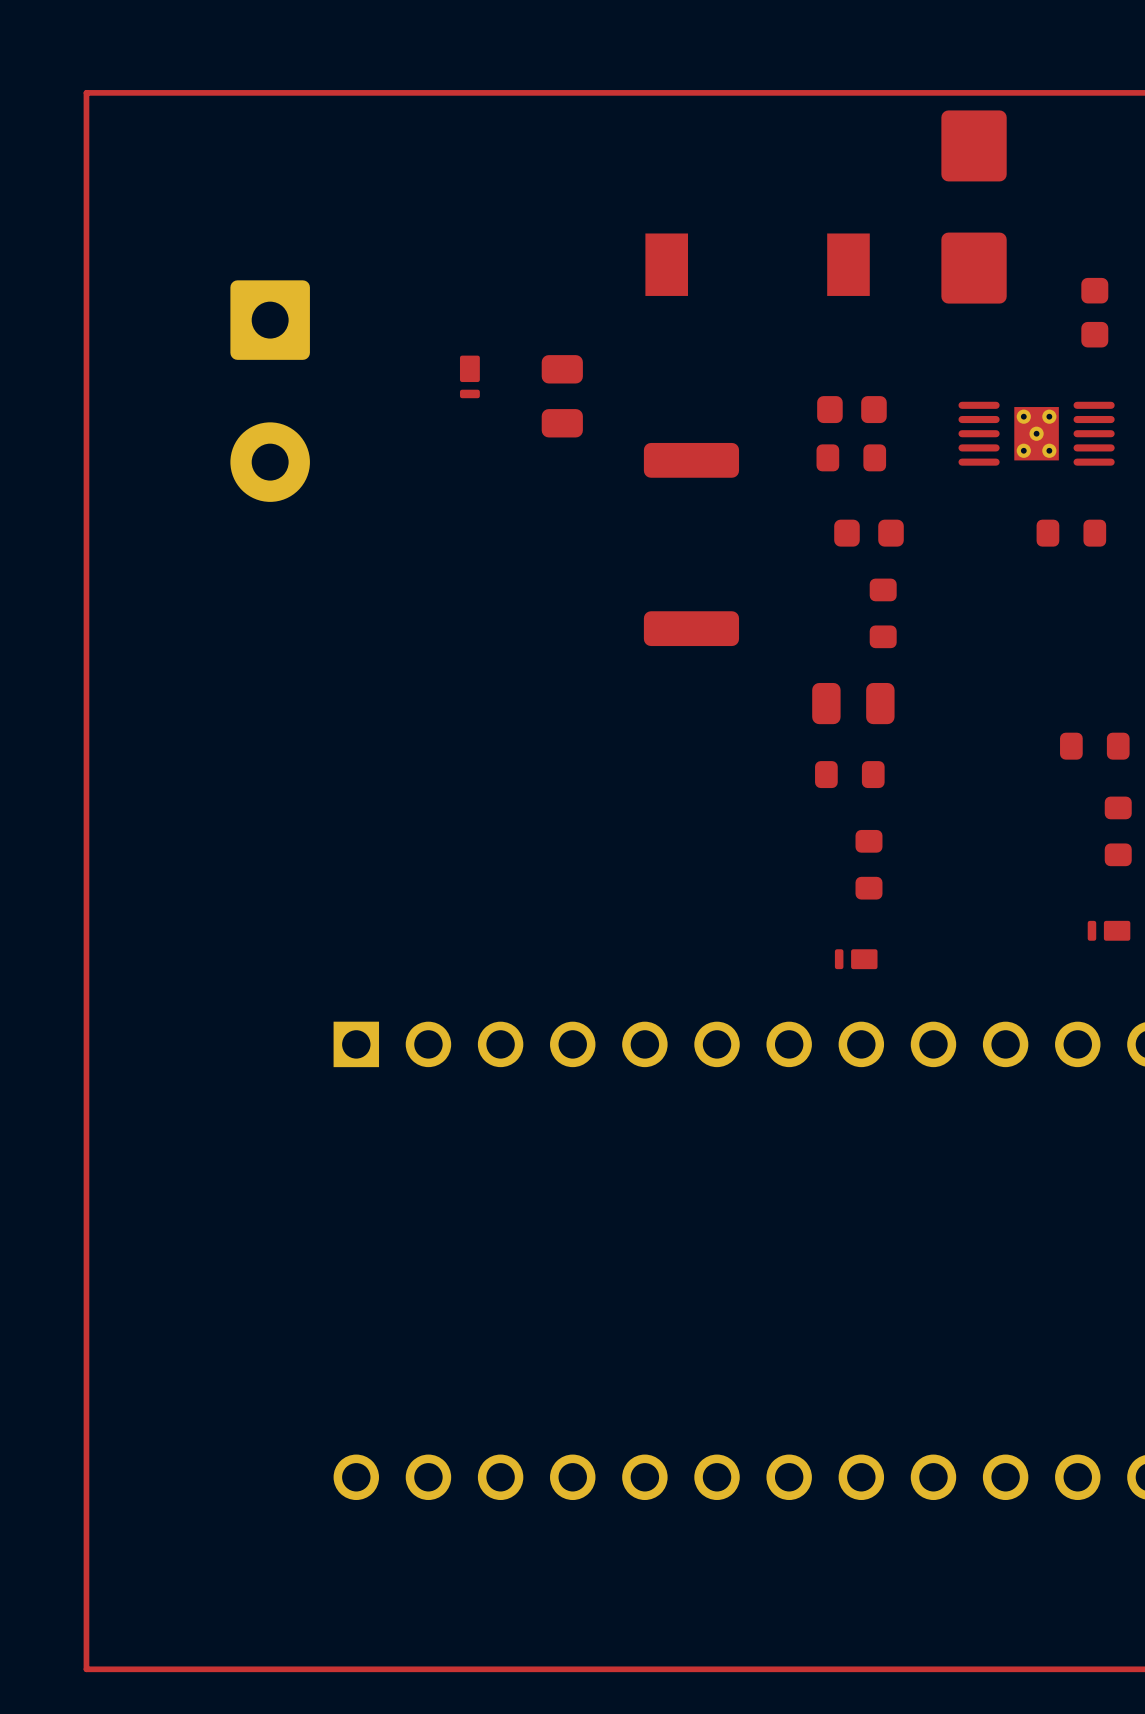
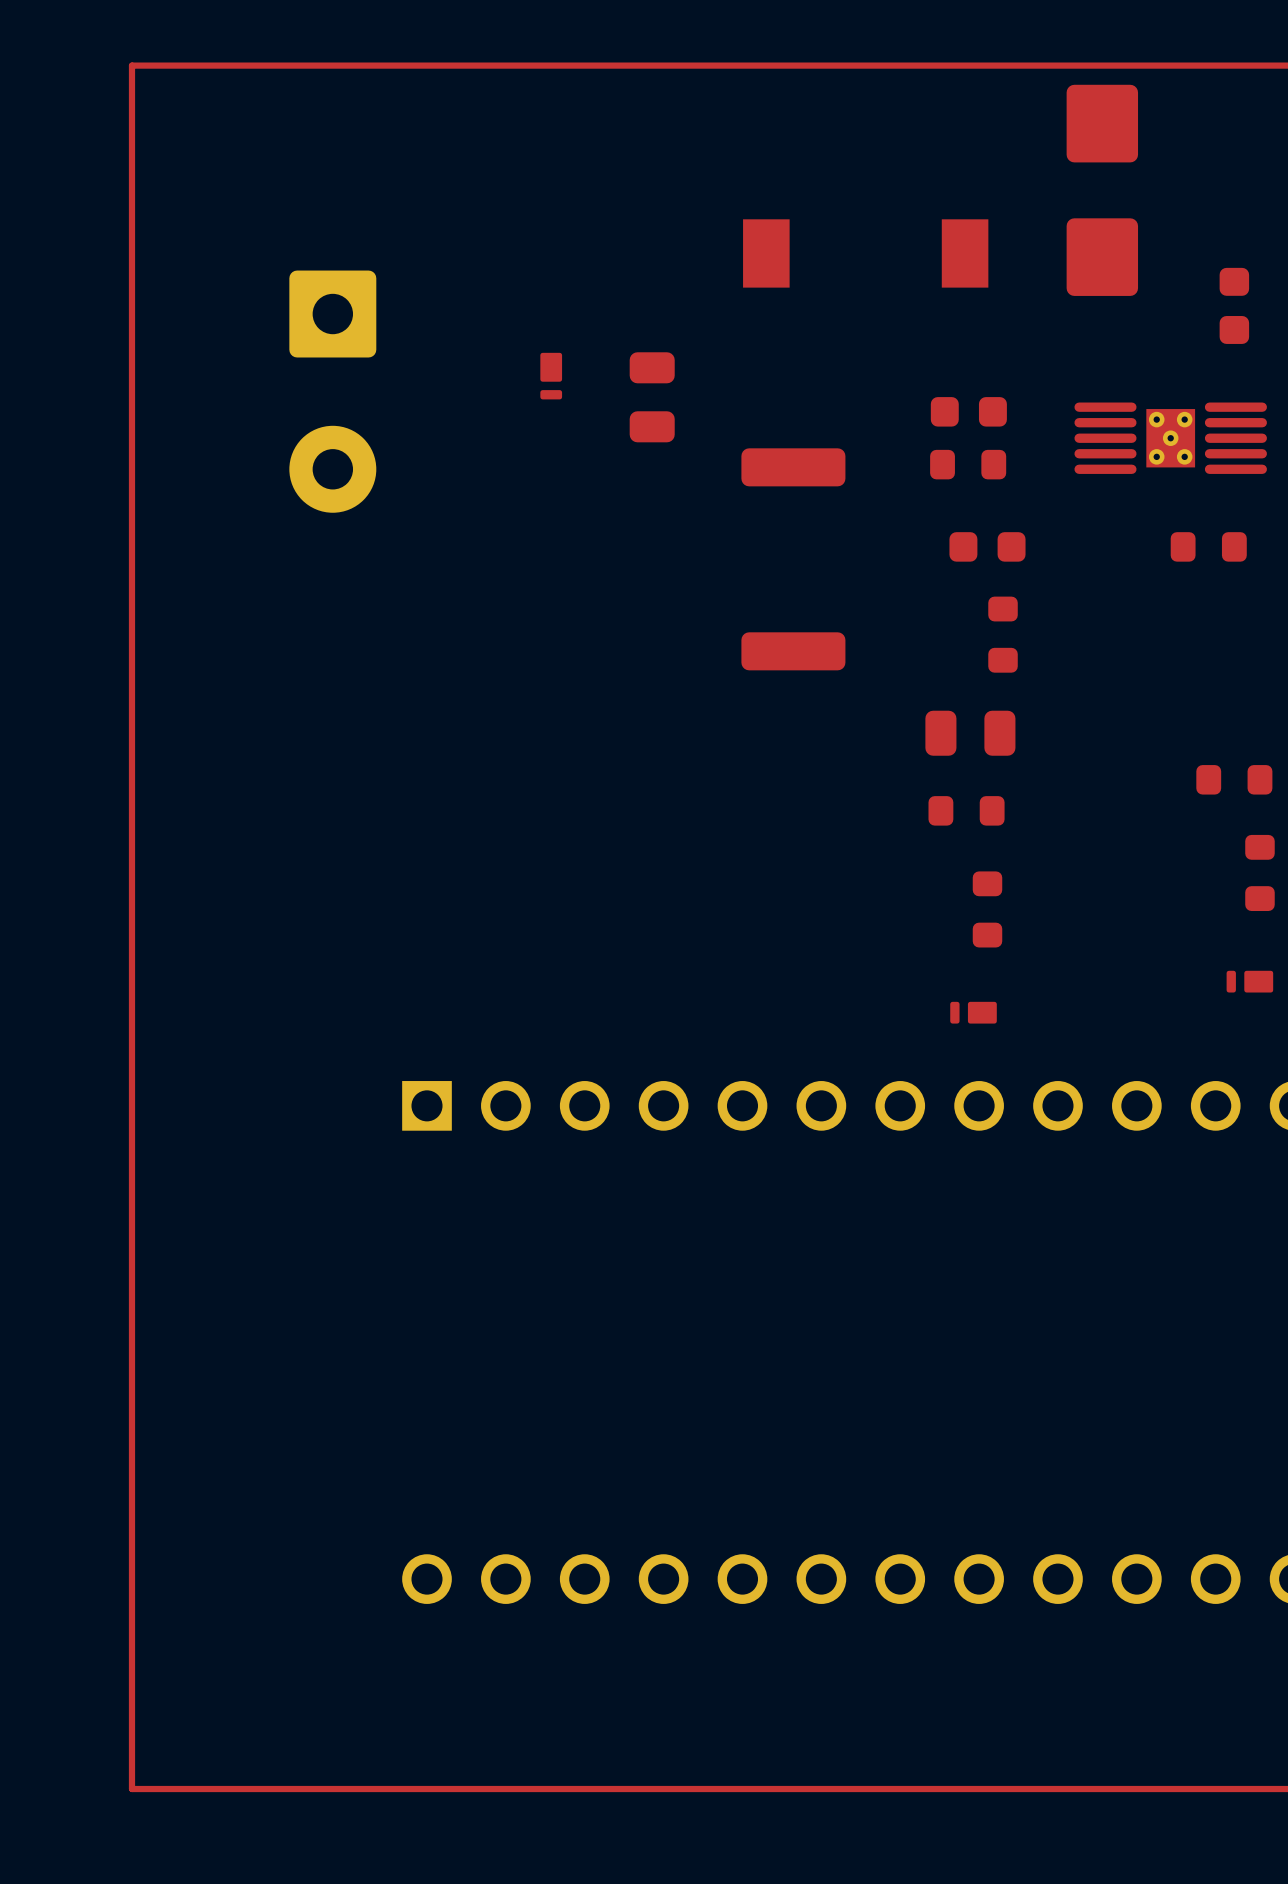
part footprint: [958, 401, 1115, 466] -> [1074, 402, 1267, 474]

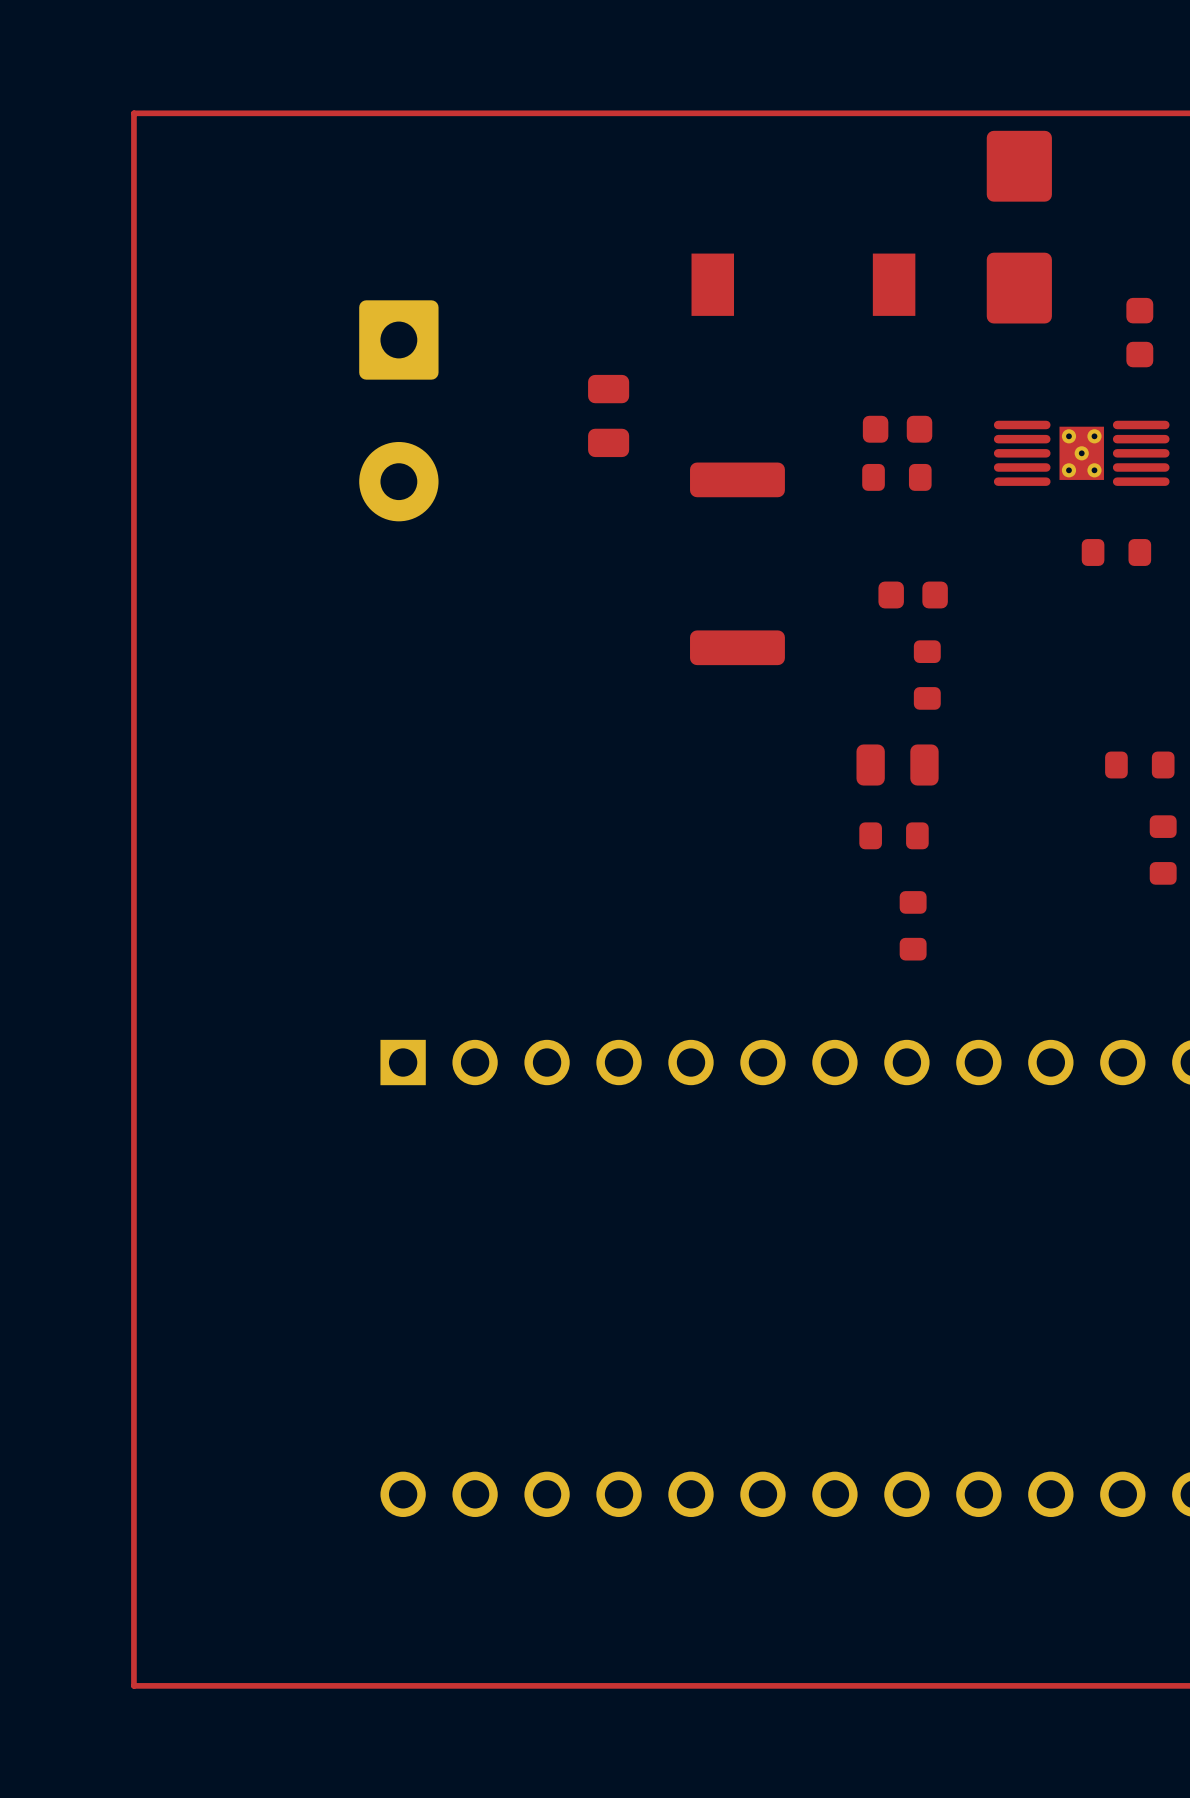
part: (551, 376) -> none
part position: (332, 391) -> (398, 410)
part position: (987, 546) -> (913, 595)
part position: (1003, 634) -> (927, 675)
part position: (970, 733) -> (897, 765)
part: (966, 810) -> none
part: none -> (894, 835)
part: (987, 909) -> none
part: none -> (913, 925)
part: (1249, 981) -> none
part: (973, 1012) -> none

